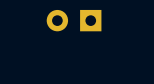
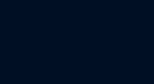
part: (74, 20) -> none

